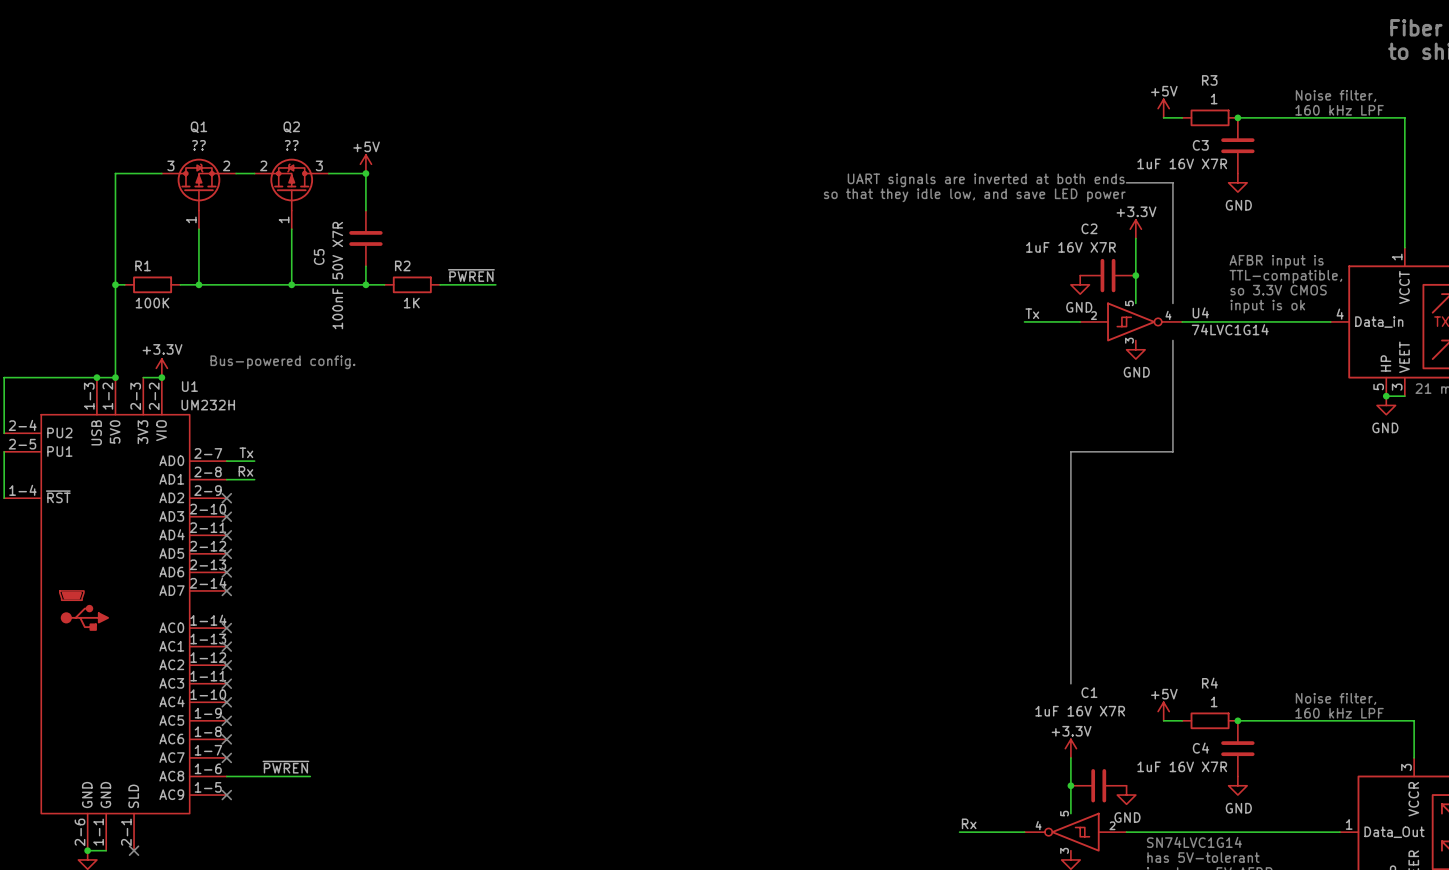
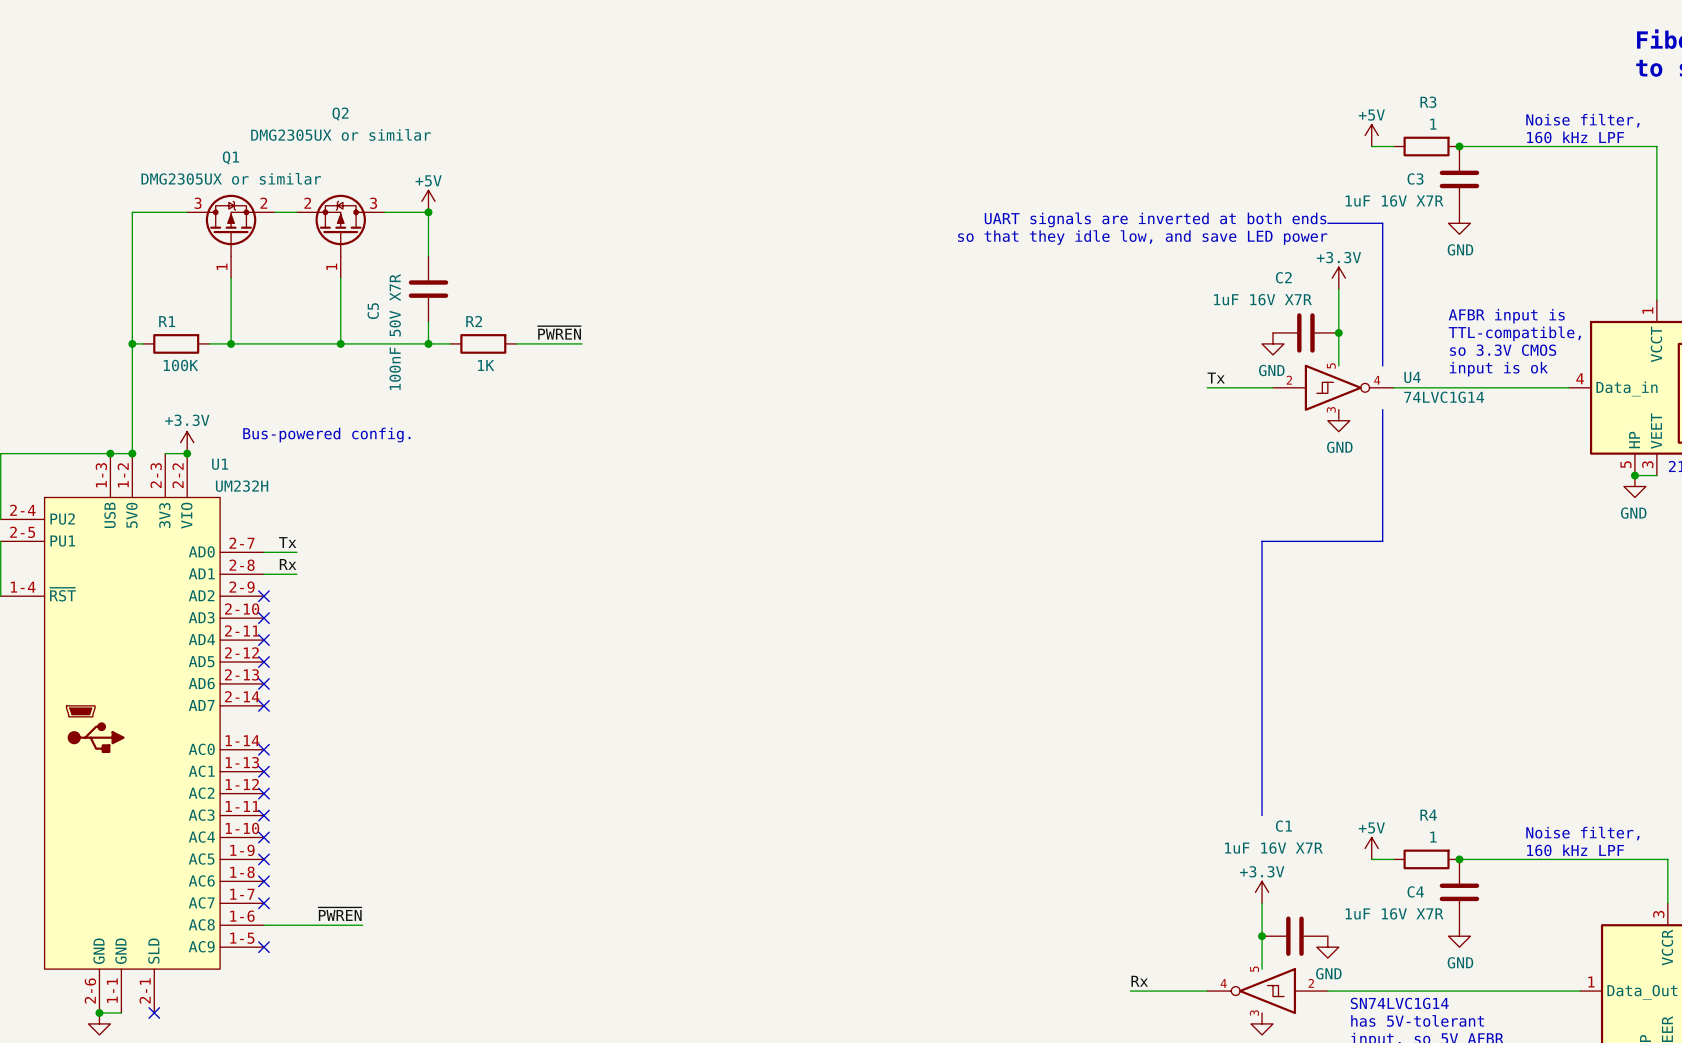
Q2 name position: Q2 (291, 127) -> Q2 (340, 114)
Q1 value: ?? (198, 145) -> DMG2305UX or similar (231, 178)
Q2 value: ?? (291, 145) -> DMG2305UX or similar (340, 134)

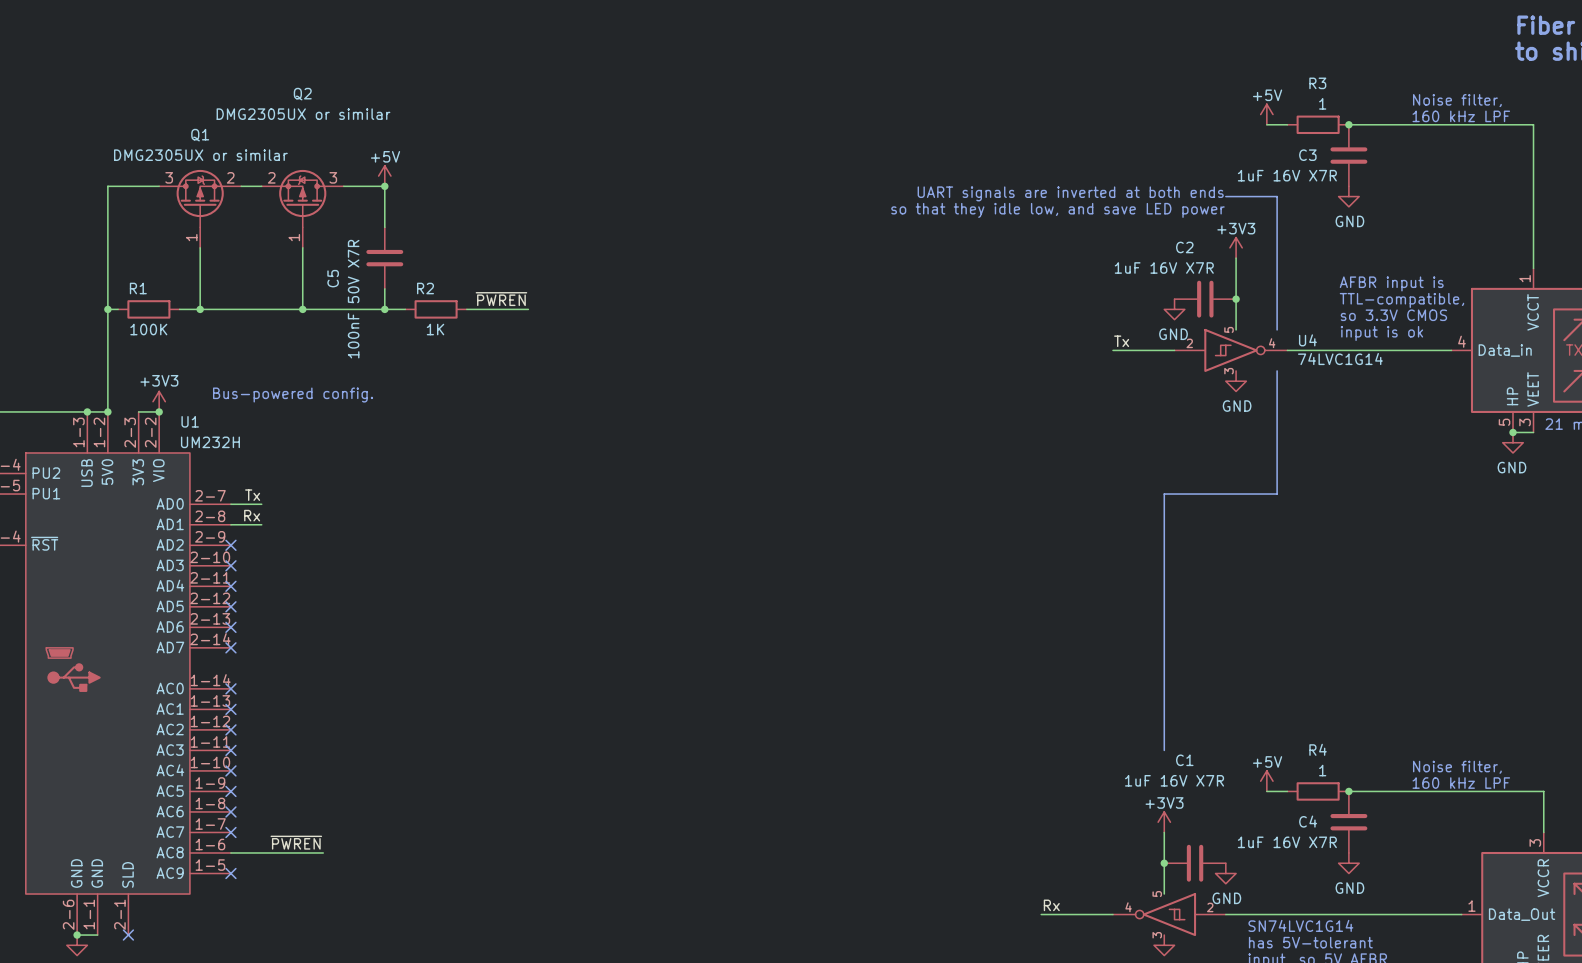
power symbol: +3.3V (1338, 278) -> +3V3 (1236, 247)
power symbol: +3.3V (187, 442) -> +3V3 (159, 401)
power symbol: +3.3V (1262, 892) -> +3V3 (1164, 822)

